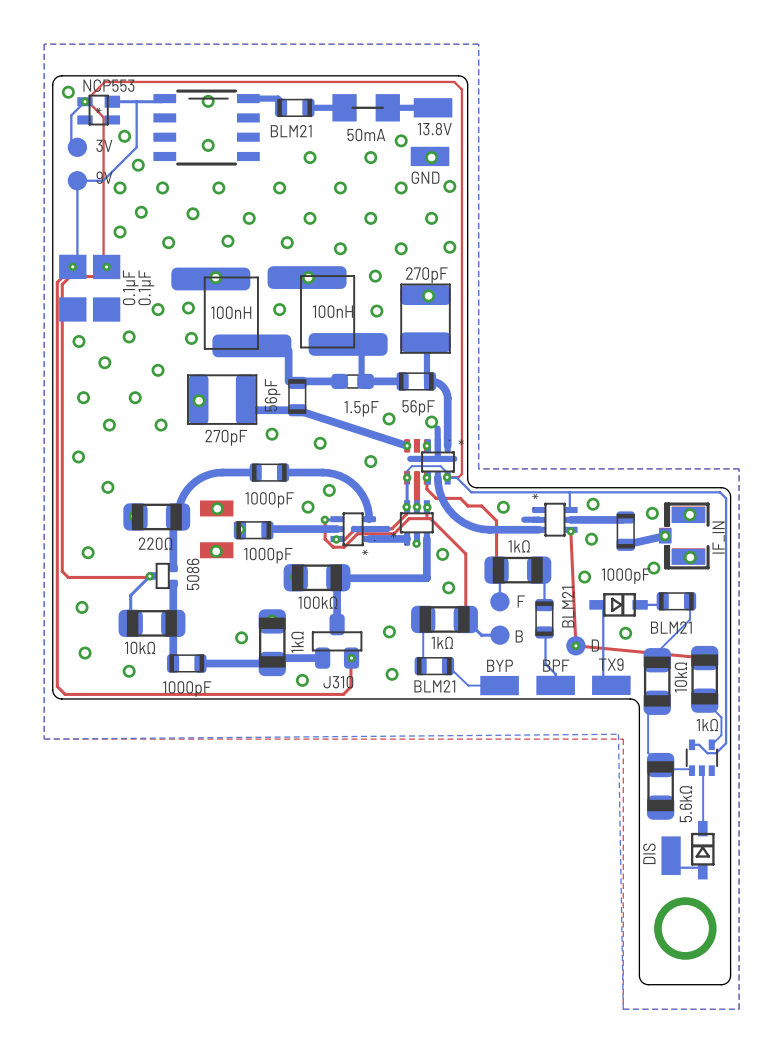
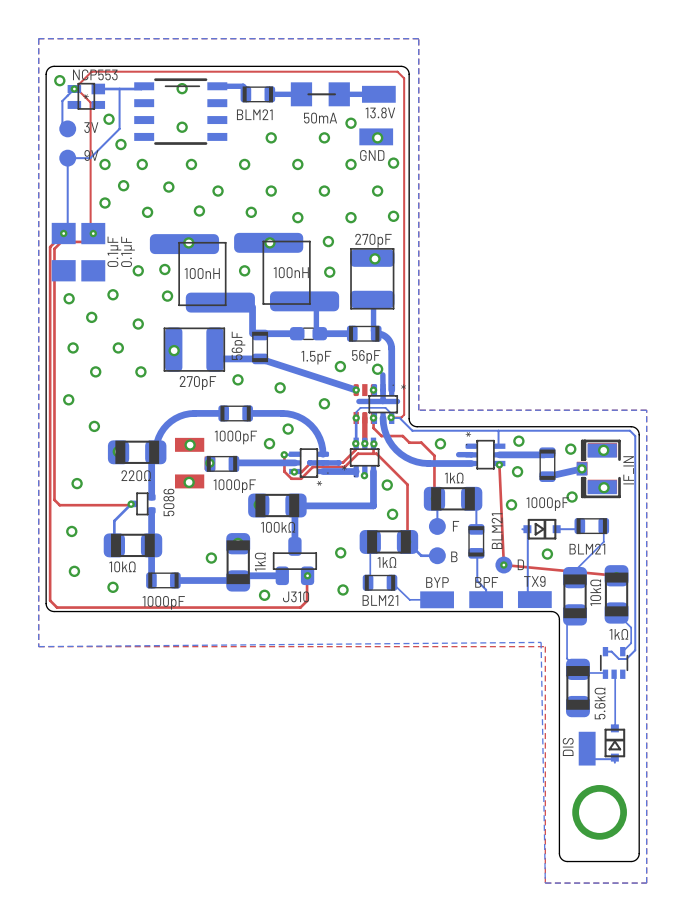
part footprint: [589, 593, 648, 617] -> [523, 518, 561, 540]
part footprint: [691, 820, 715, 880] -> [604, 724, 626, 762]

